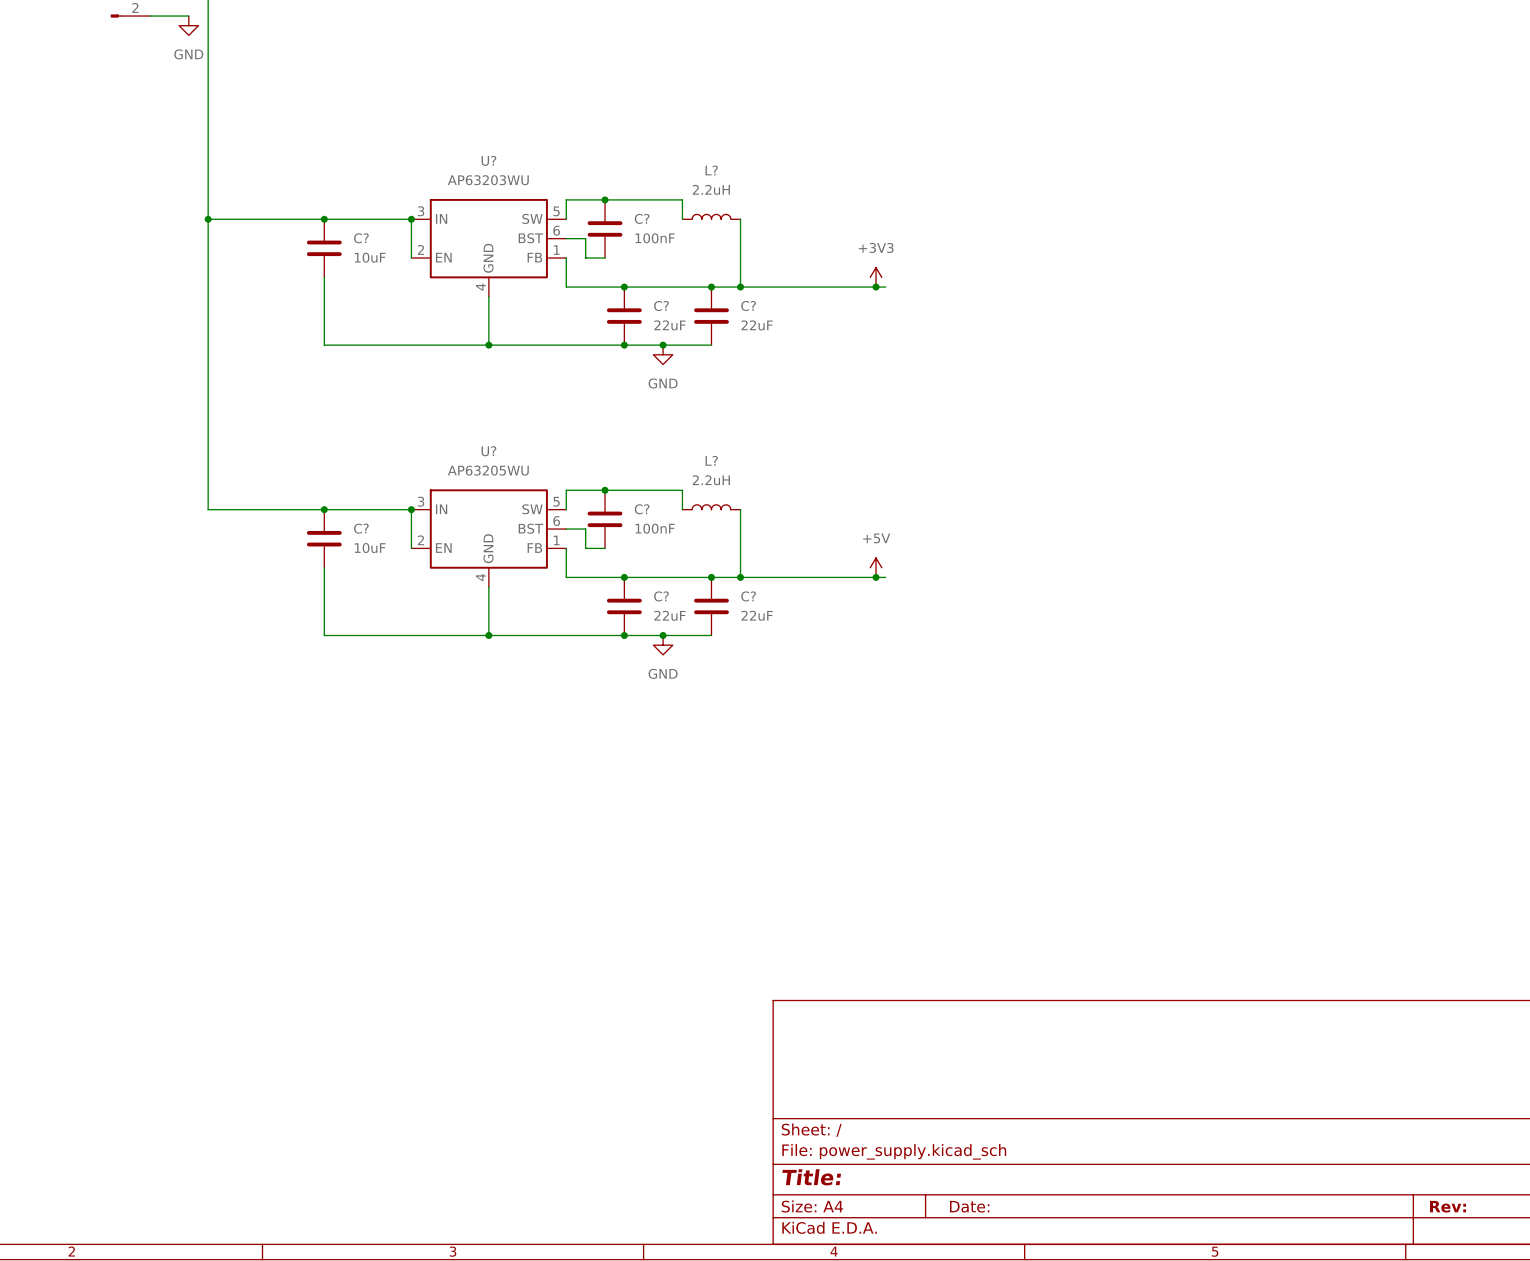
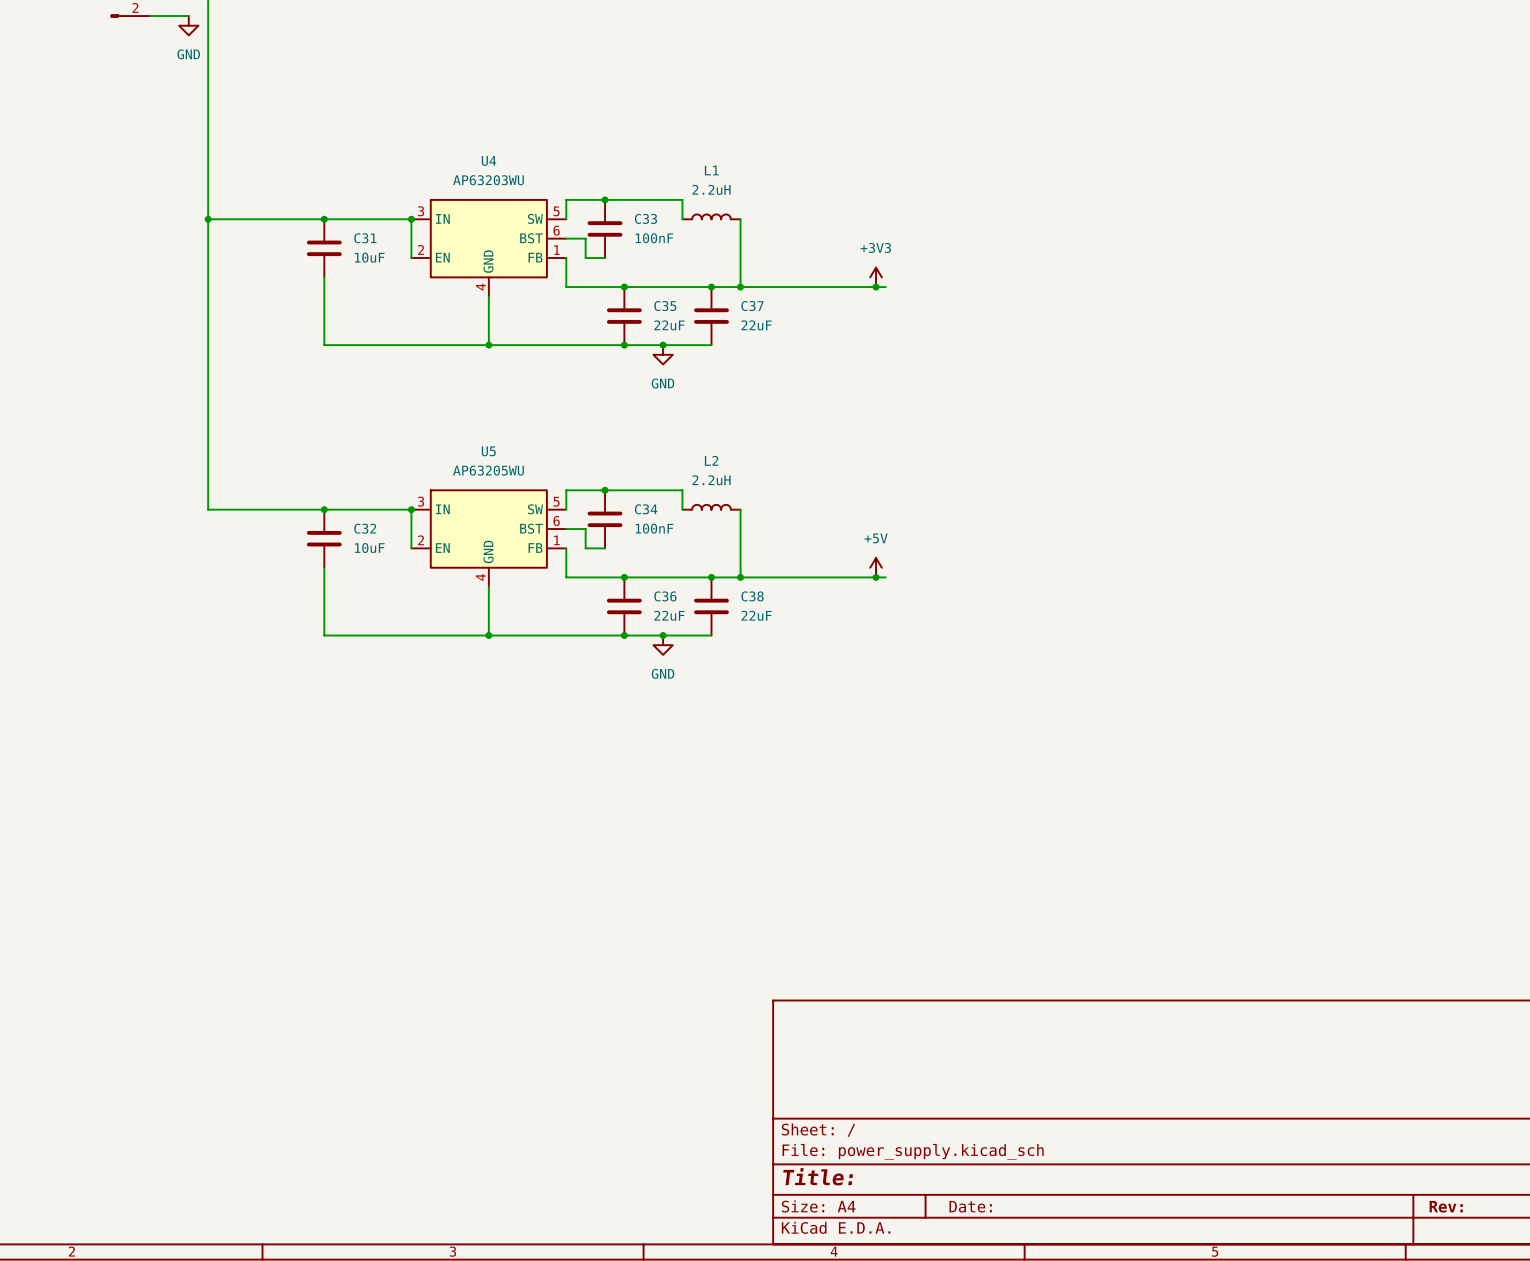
U? name: U? (488, 160) -> U4 (489, 160)
L? name: L? (711, 170) -> L1 (711, 170)
C? name: C? (642, 218) -> C33 (645, 218)
C? name: C? (361, 238) -> C31 (365, 238)
C? name: C? (661, 306) -> C35 (665, 306)
C? name: C? (748, 306) -> C37 (752, 306)
U? name: U? (488, 451) -> U5 (488, 451)
L? name: L? (711, 460) -> L2 (711, 460)
C? name: C? (642, 509) -> C34 (646, 509)
C? name: C? (361, 528) -> C32 (365, 528)
C? name: C? (661, 596) -> C36 (665, 596)
C? name: C? (748, 596) -> C38 (752, 596)

